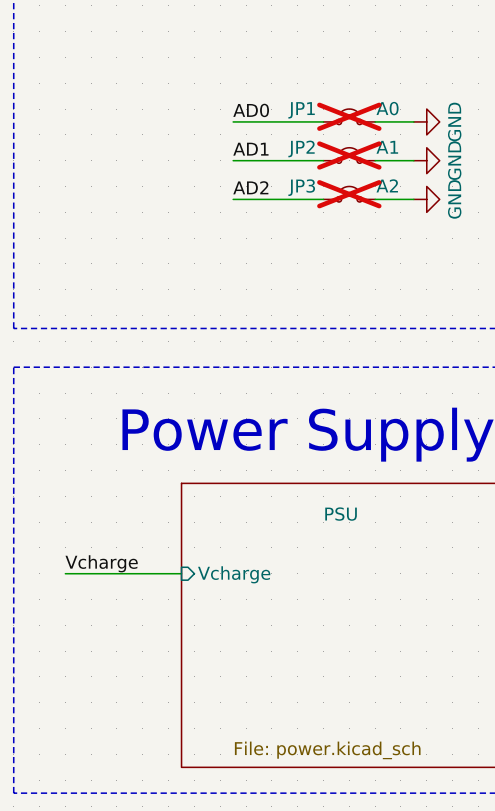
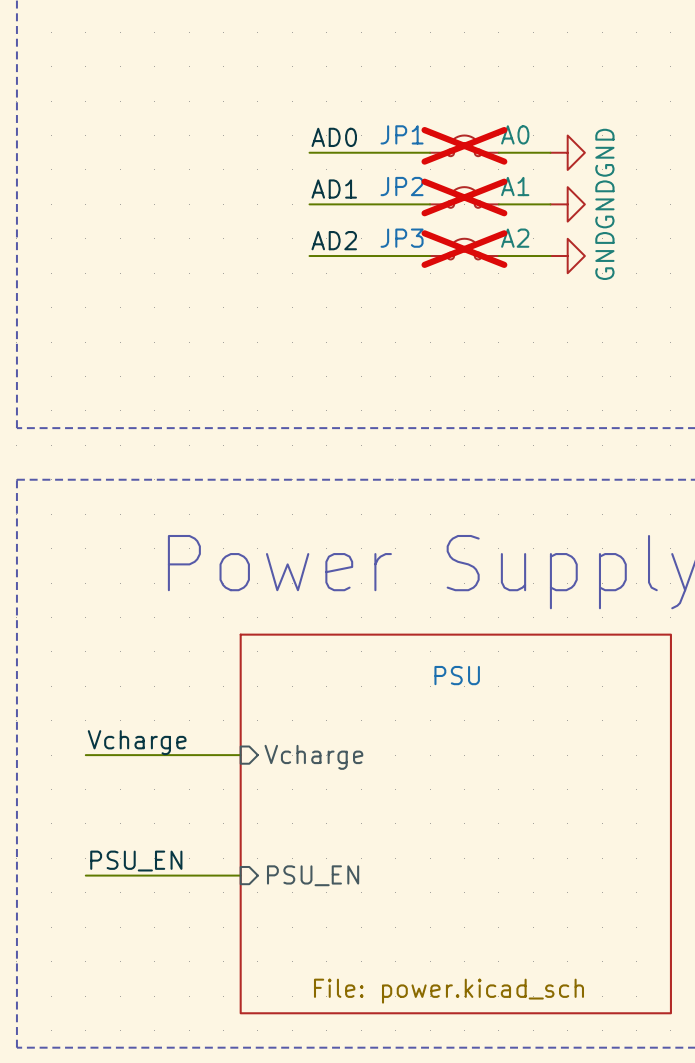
label: none -> PSU_EN (136, 861)
wire: none -> (85, 875) (240, 875)
sheet pin: none -> PSU_EN (313, 875)

